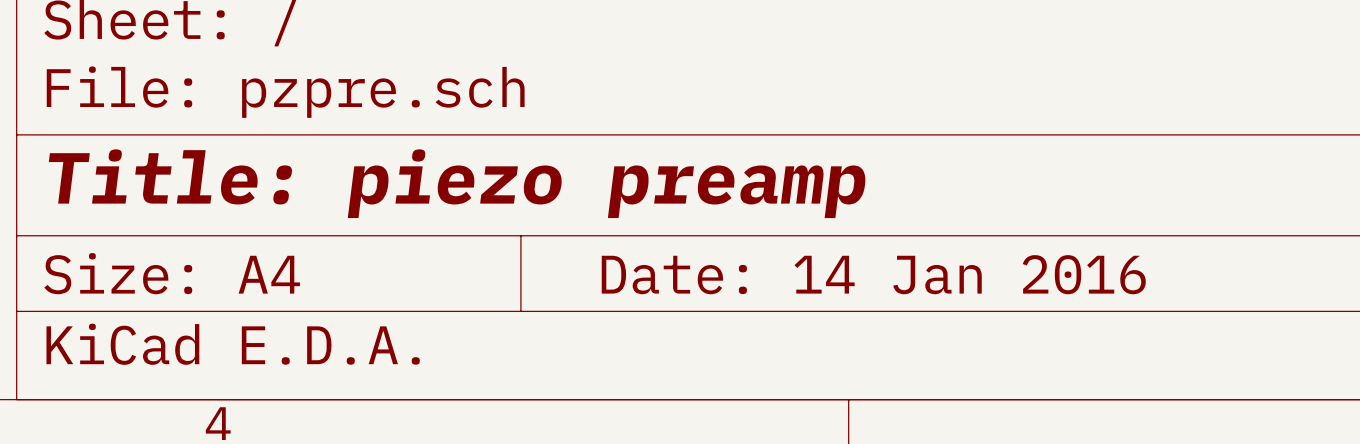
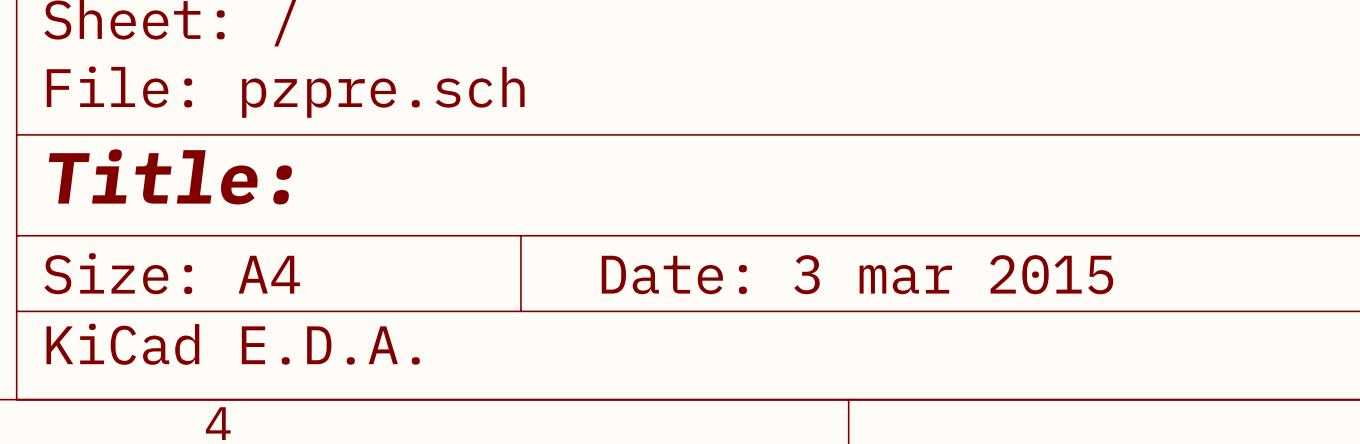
title block: Title: piezo preamp (457, 183) -> Title: (170, 176)
title block: Date: 14 Jan 2016 (873, 274) -> Date: 3 mar 2015 (857, 274)

